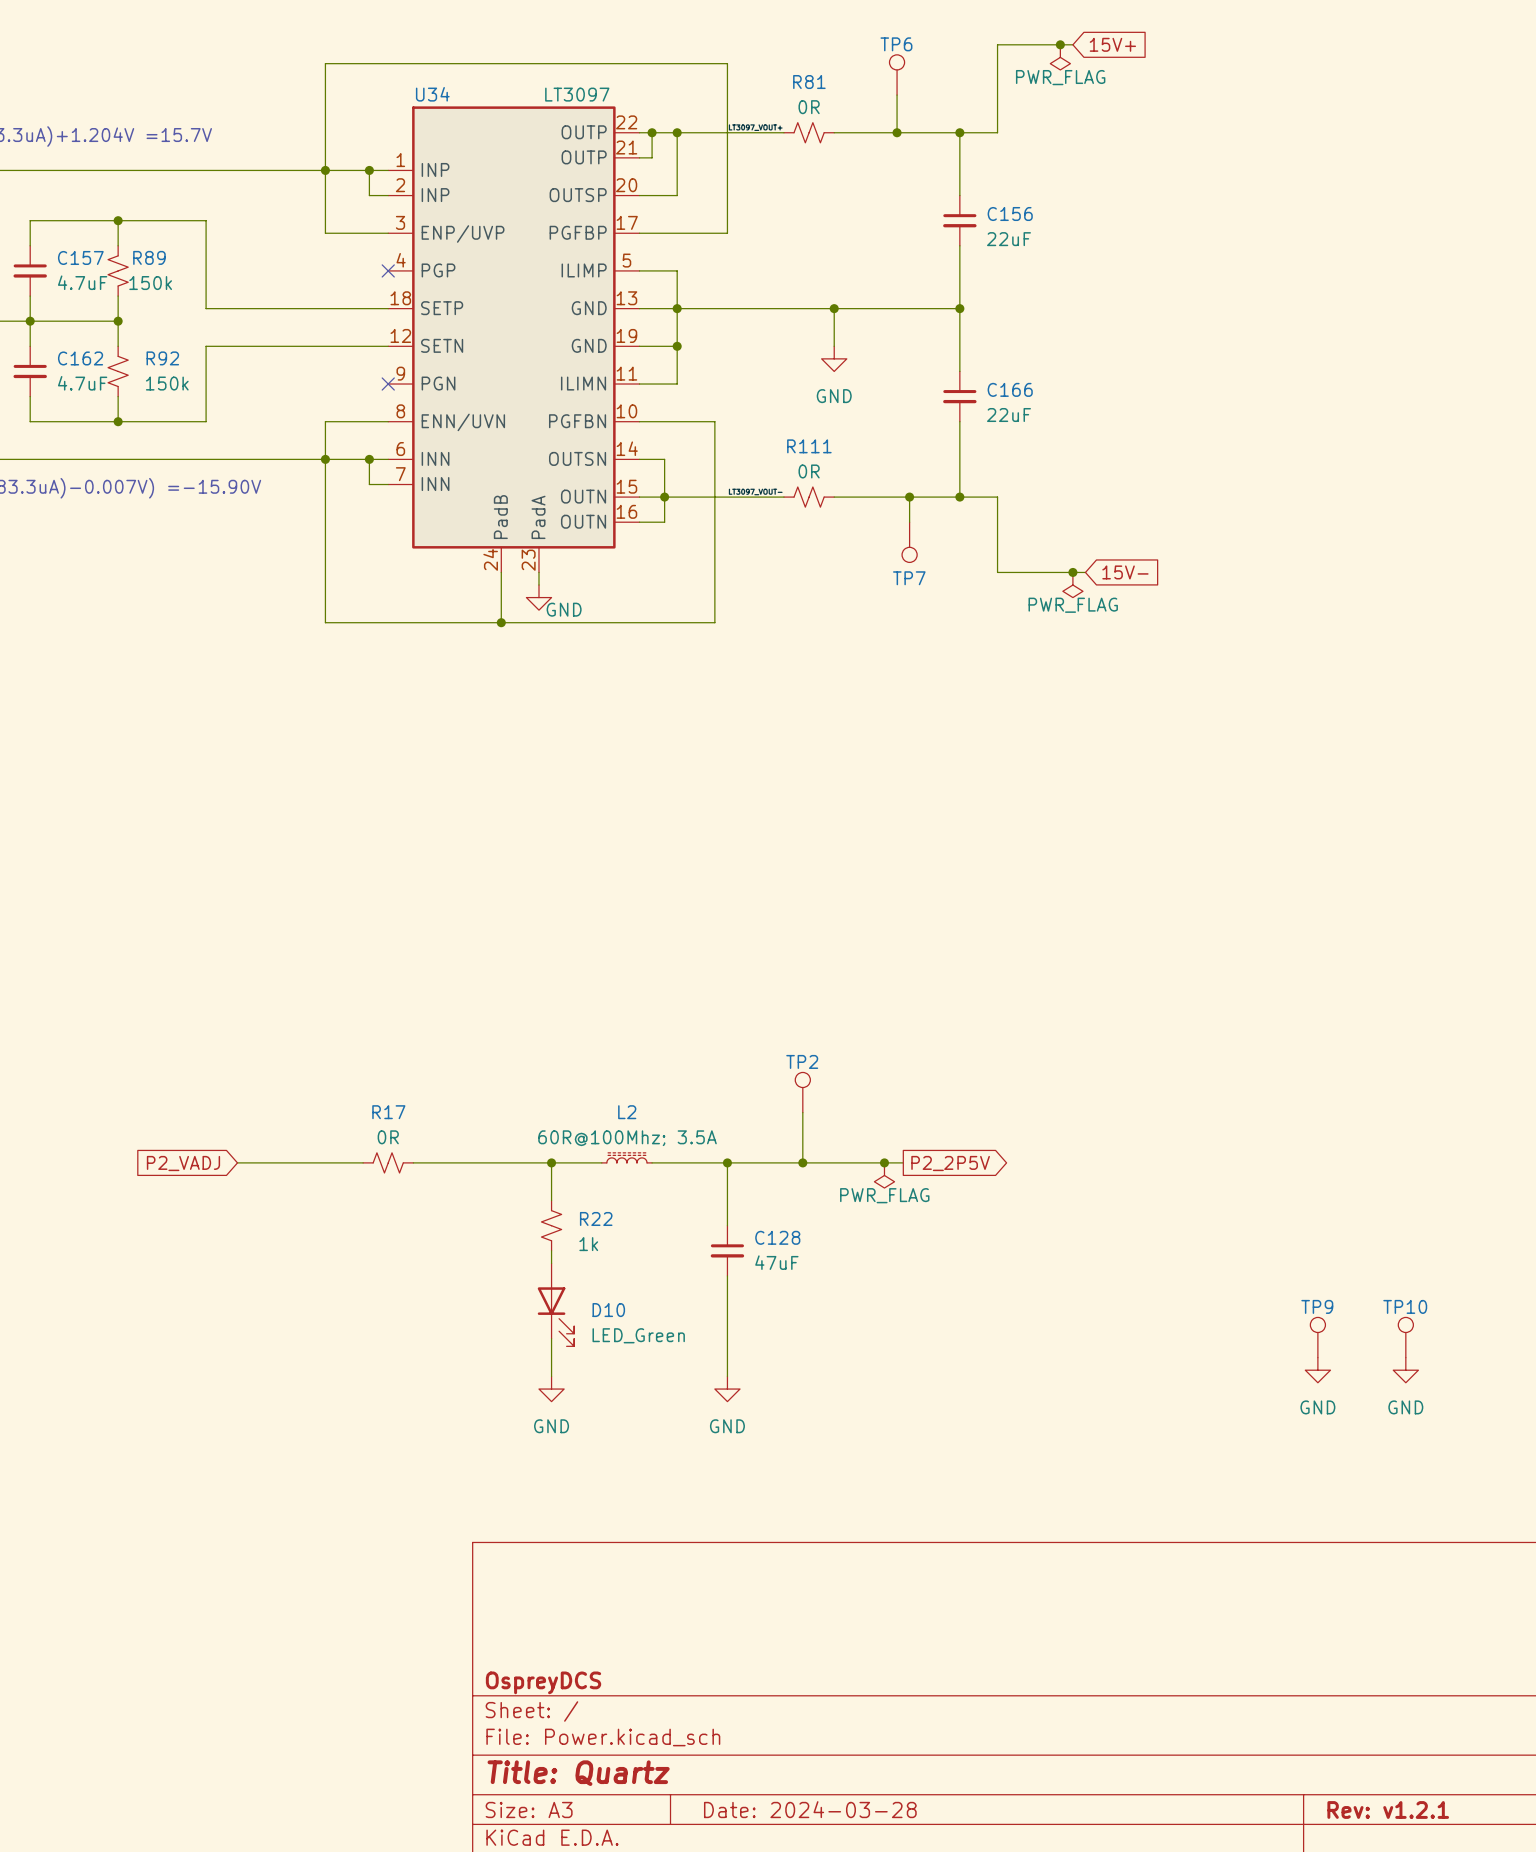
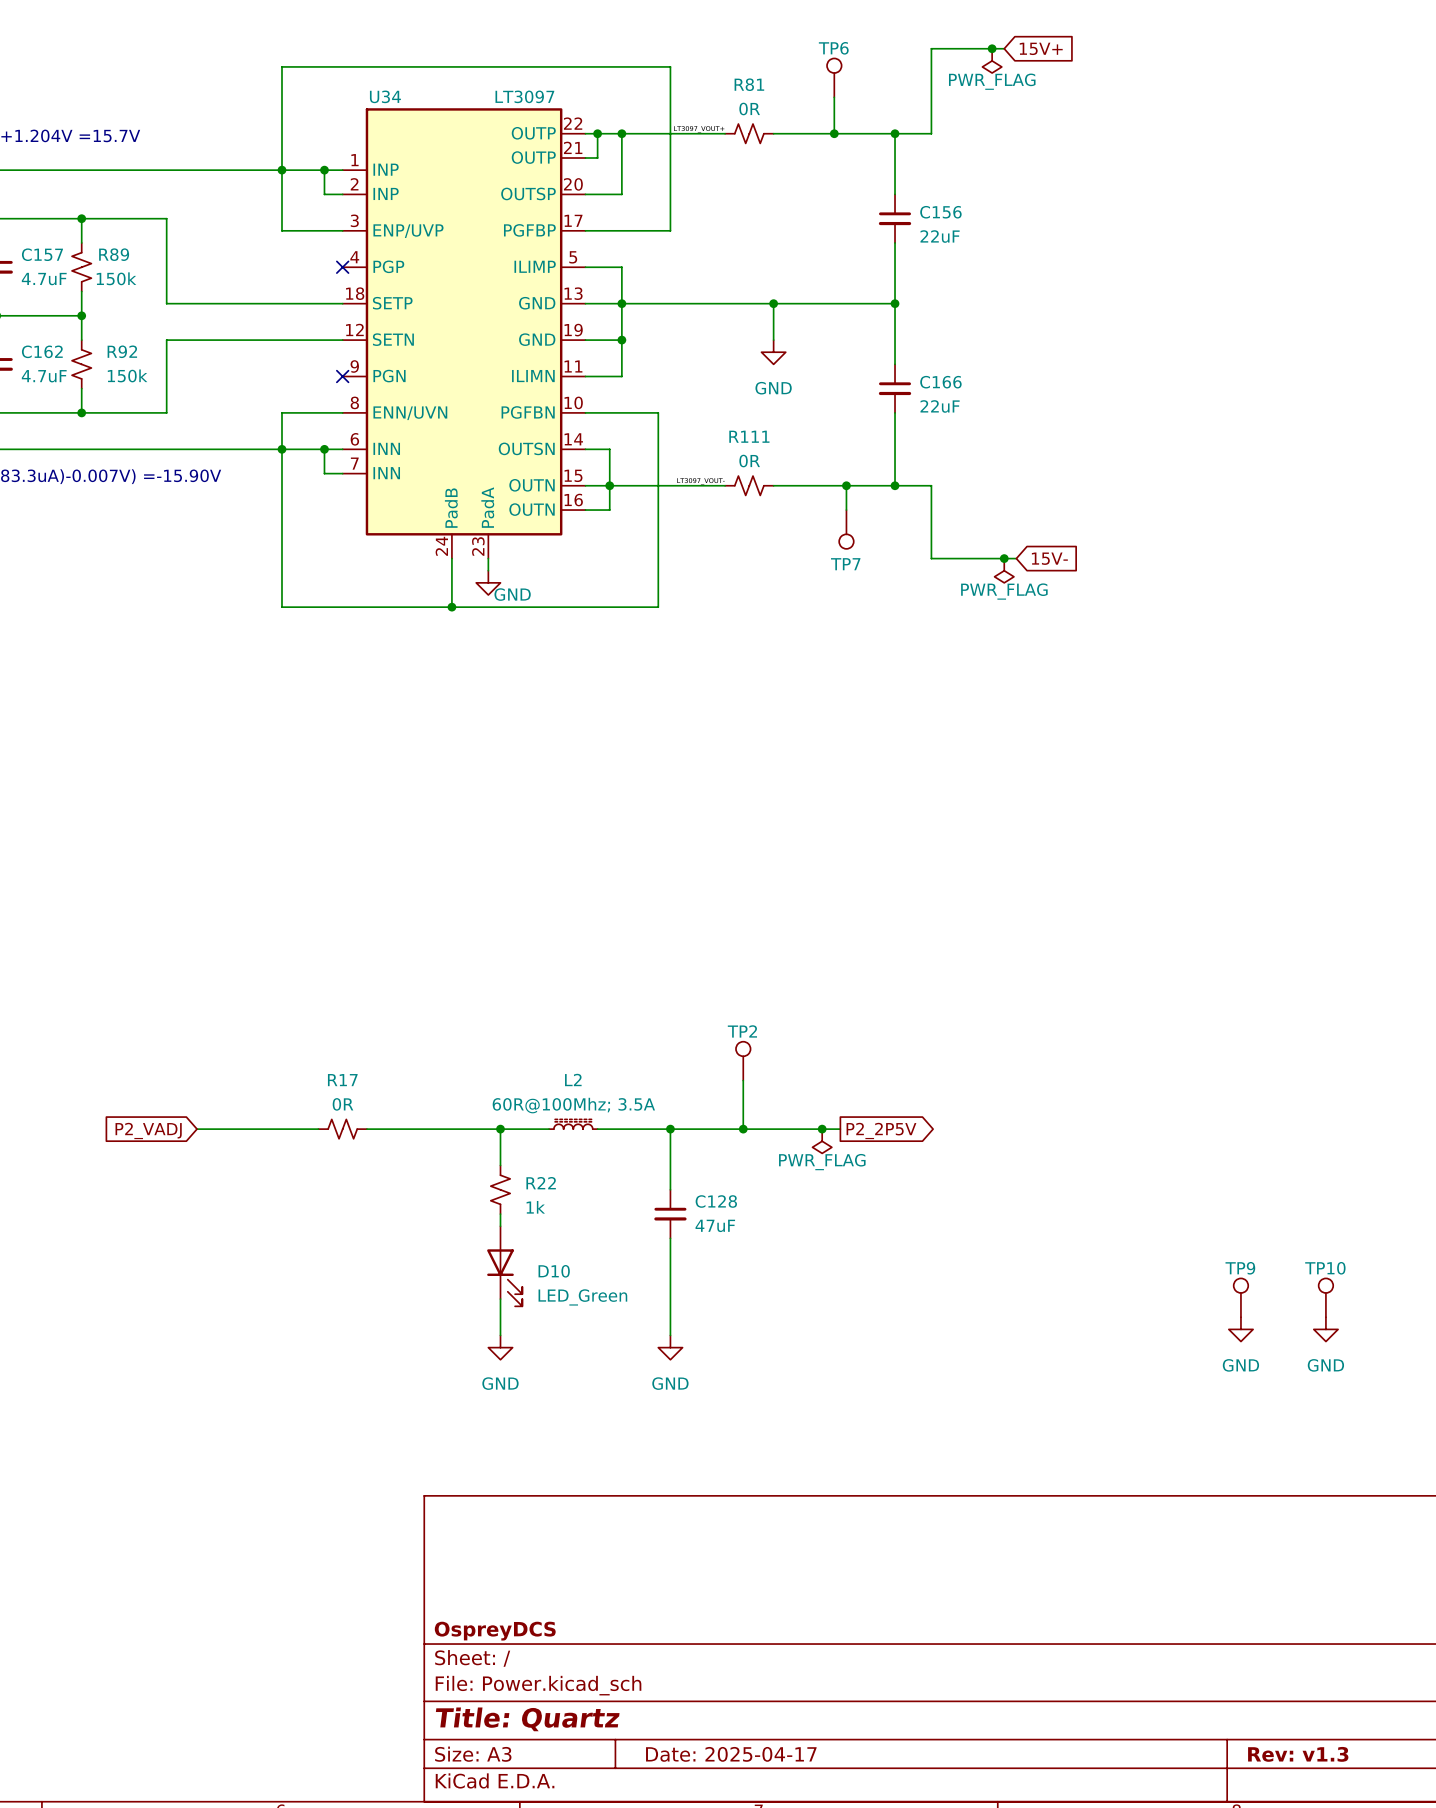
title block: Date: 2024-03-28 (810, 1809) -> Date: 2025-04-17 (731, 1754)
title block: Rev: v1.2.1 (1388, 1809) -> Rev: v1.3 (1298, 1754)

